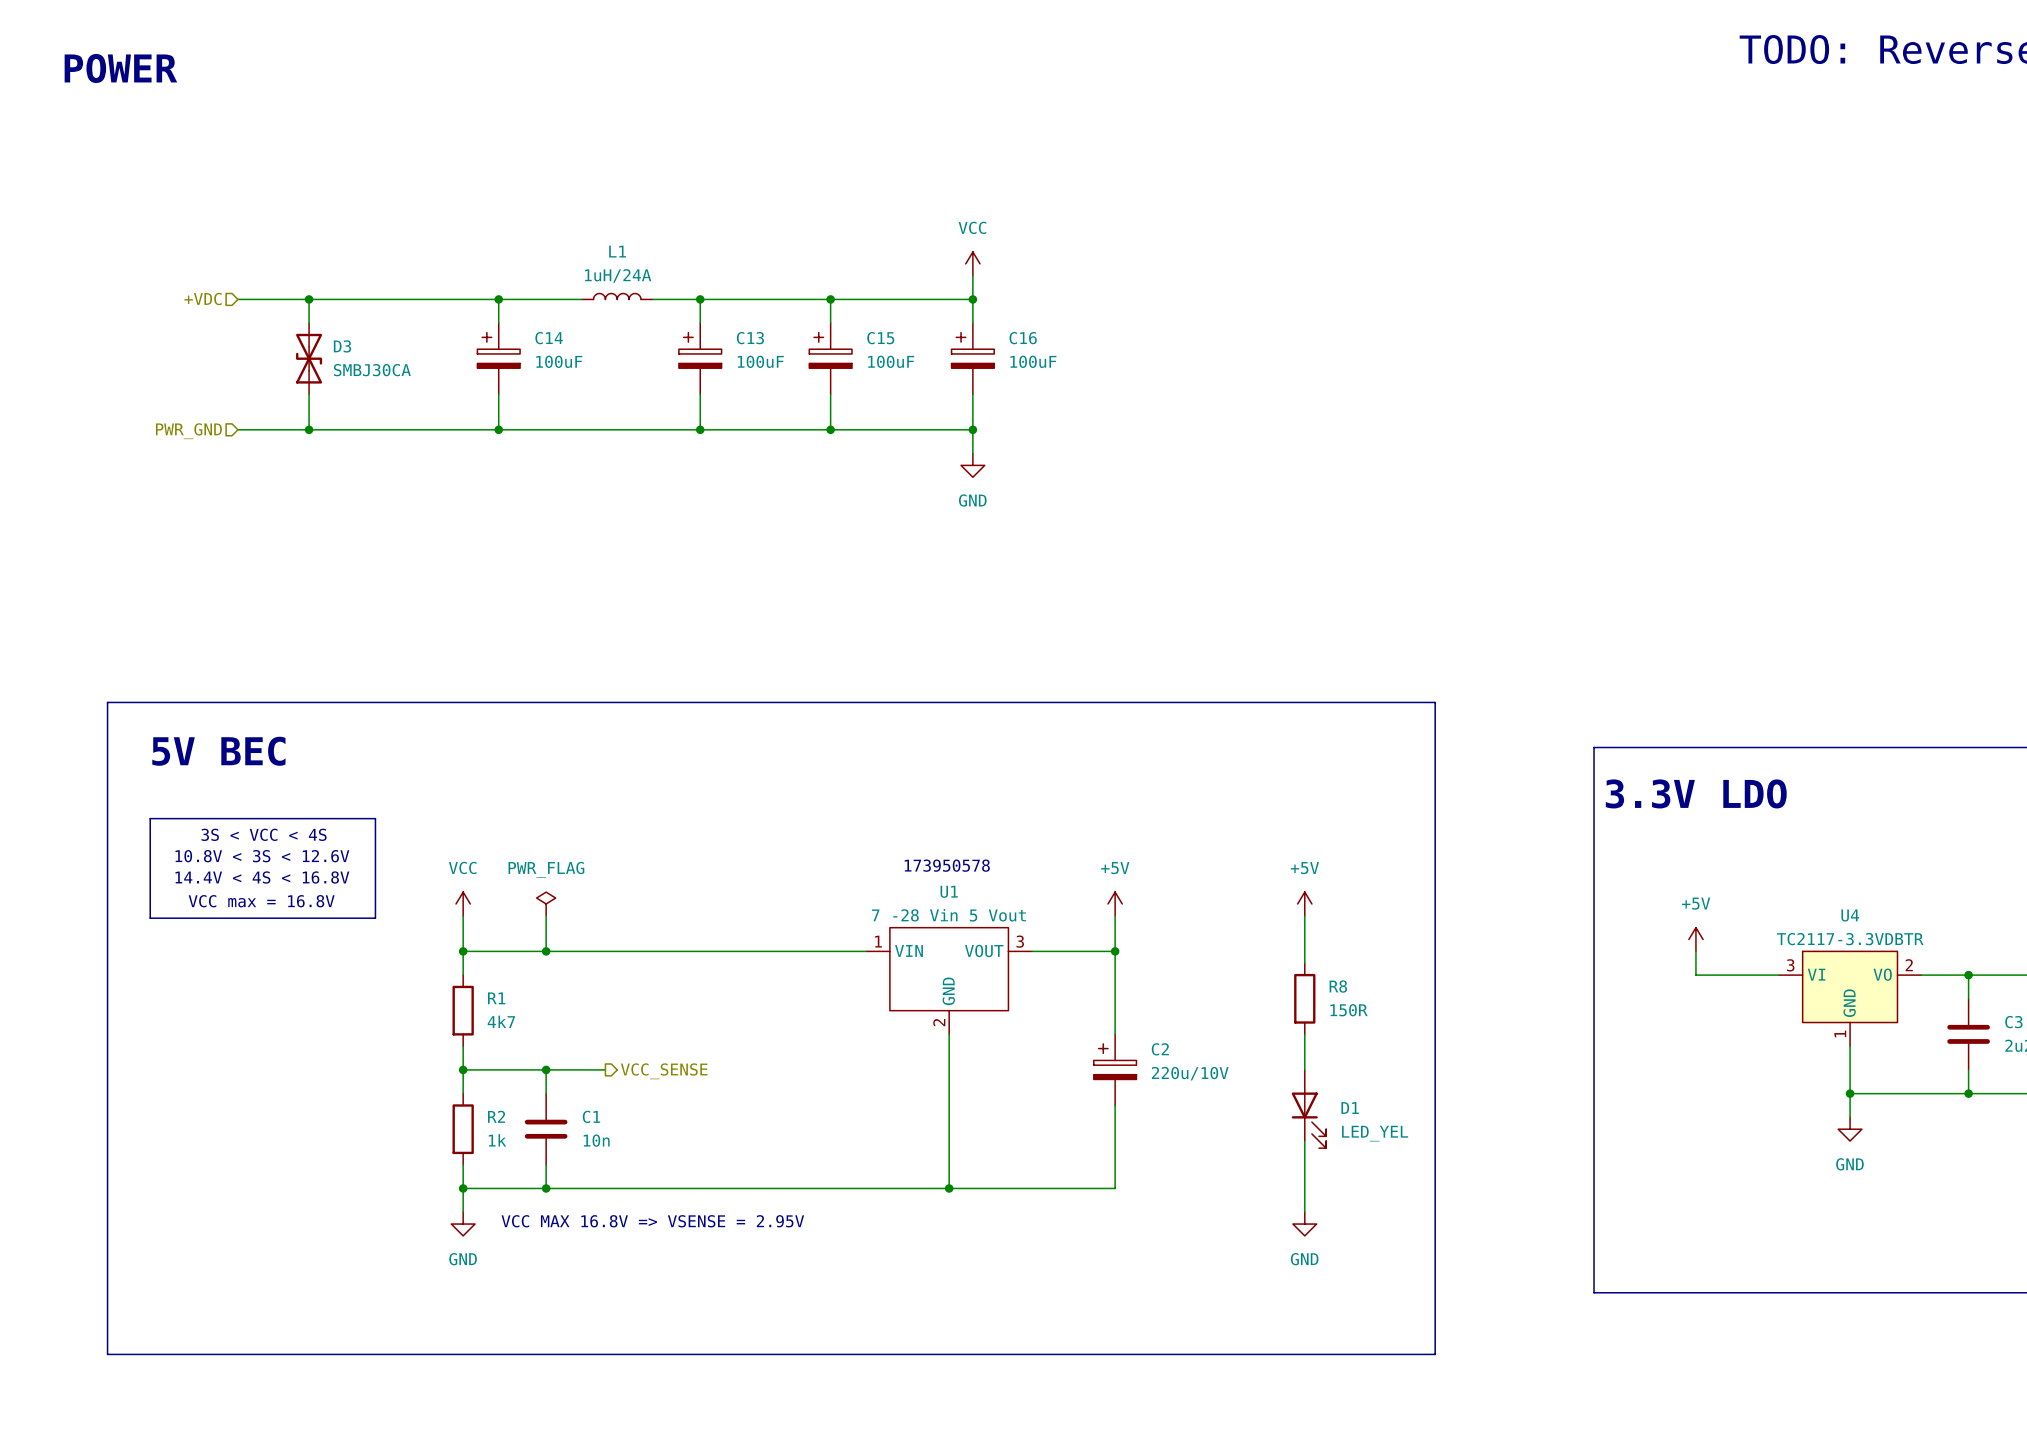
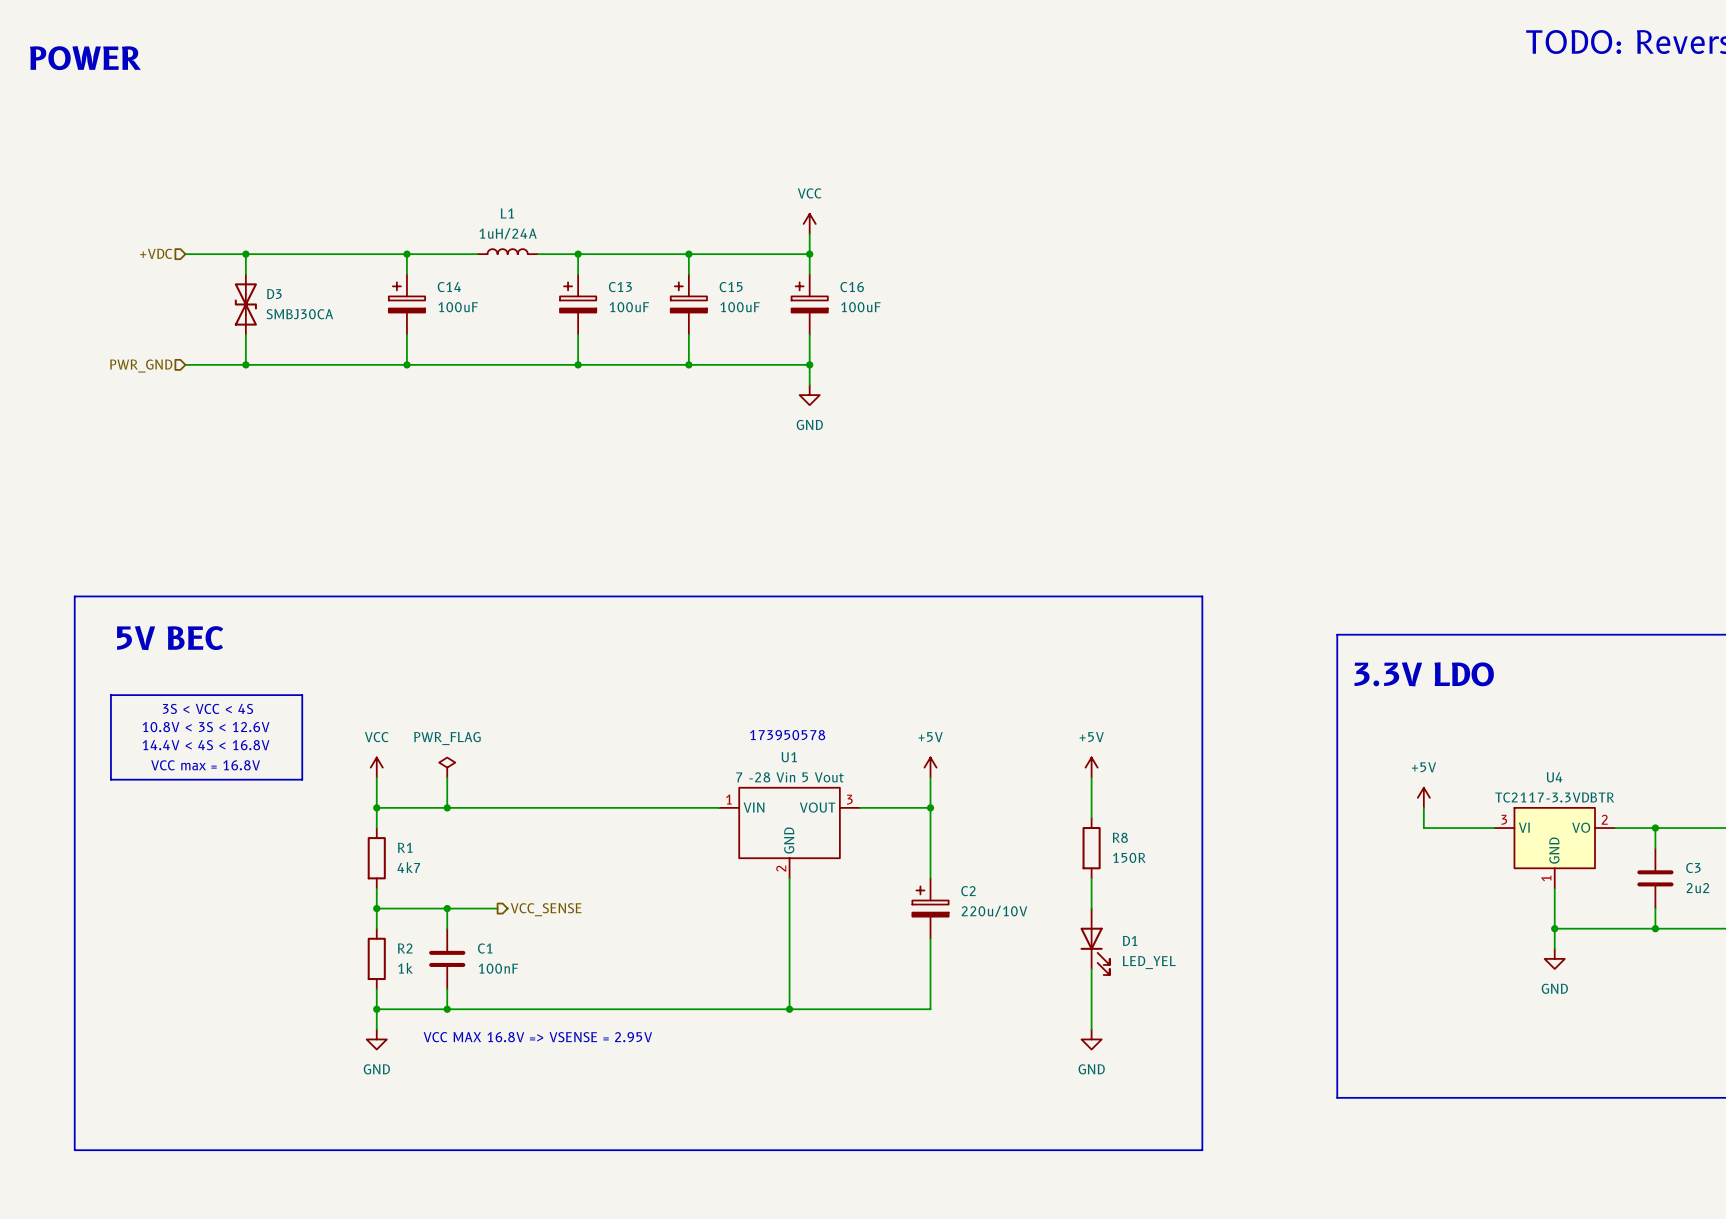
C1 value: 10n (596, 1140) -> 100nF (498, 968)

